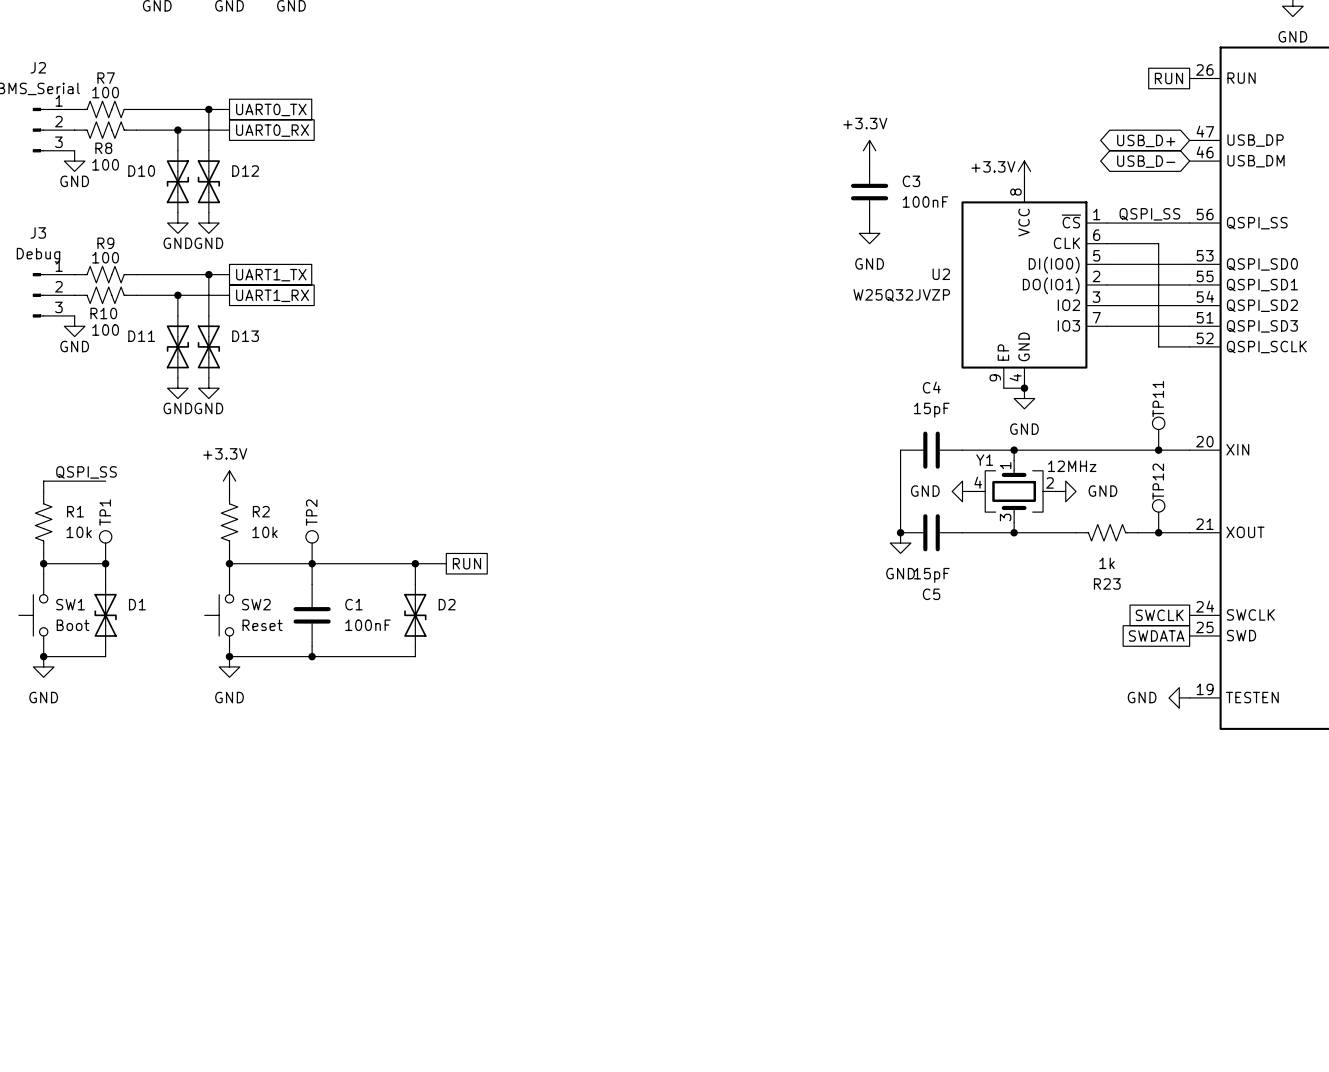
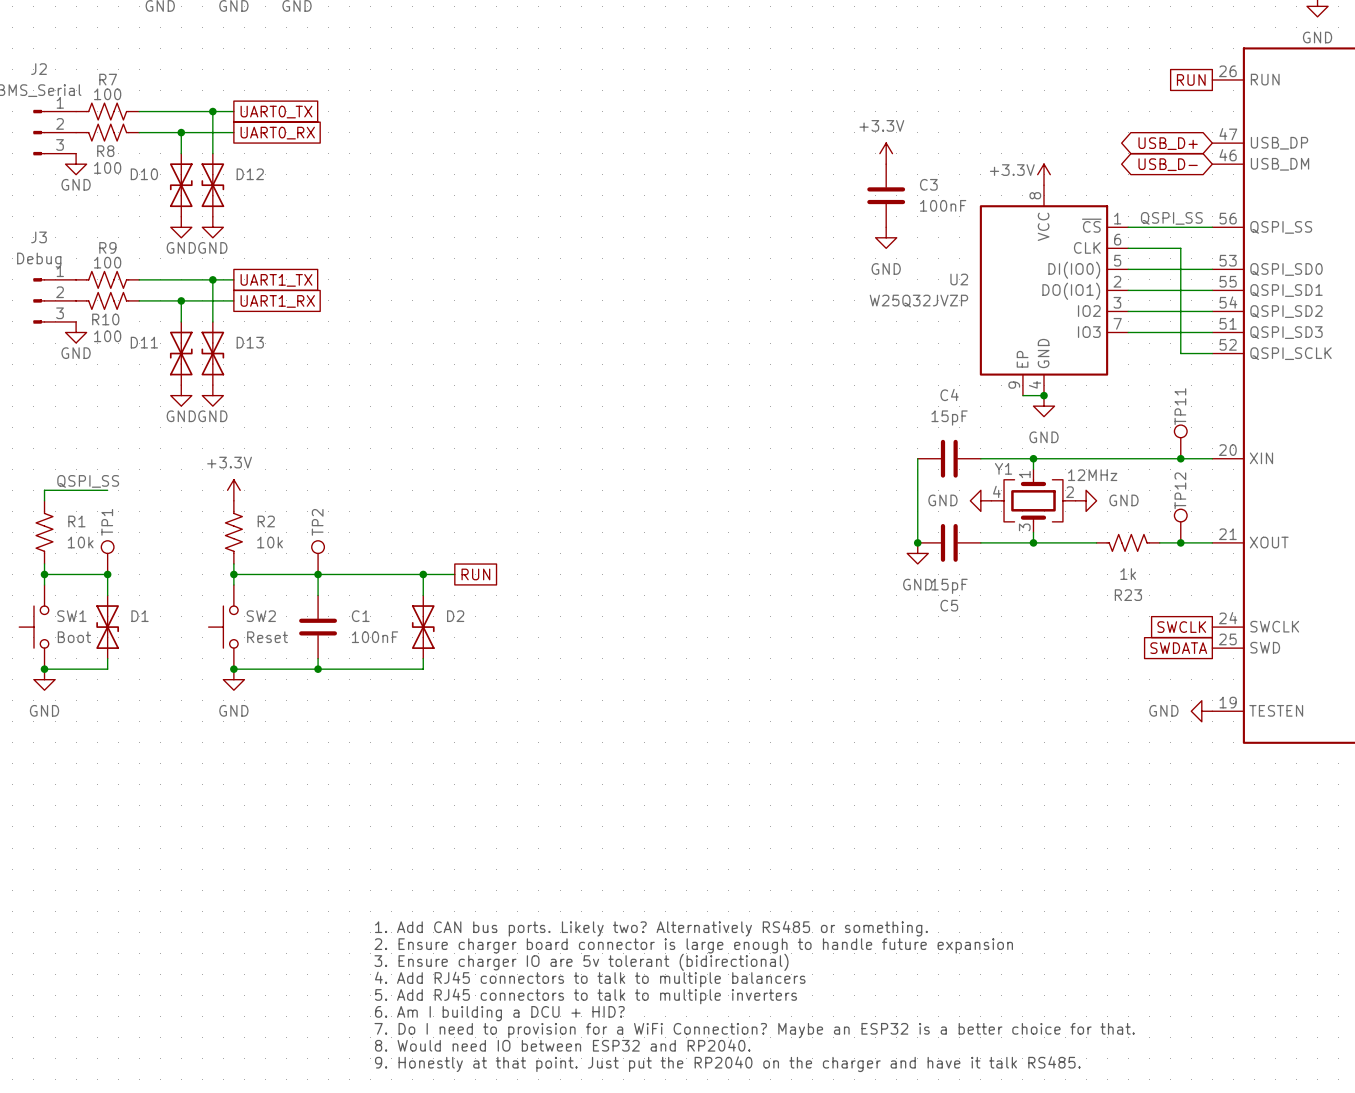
text: none -> 1. Add CAN bus ports. Likely two? Alternatively RS485 or something. (651, 928)
text: none -> 2. Ensure charger board connector is large enough to handle future expansion (693, 945)
text: none -> 3. Ensure charger IO are 5v tolerant (bidirectional) (581, 962)
text: none -> 4. Add RJ45 connectors to talk to multiple balancers (590, 979)
text: none -> 5. Add RJ45 connectors to talk to multiple inverters (586, 996)
text: none -> 6. Am I building a DCU + HID? (499, 1013)
text: none -> 7. Do I need to provision for a WiFi Connection? Maybe an ESP32 is a better choice for that. (754, 1030)
text: none -> 8. Would need IO between ESP32 and RP2040. (562, 1045)
text: none -> 9. Honestly at that point. Just put the RP2040 on the charger and have it talk RS485. (727, 1064)

